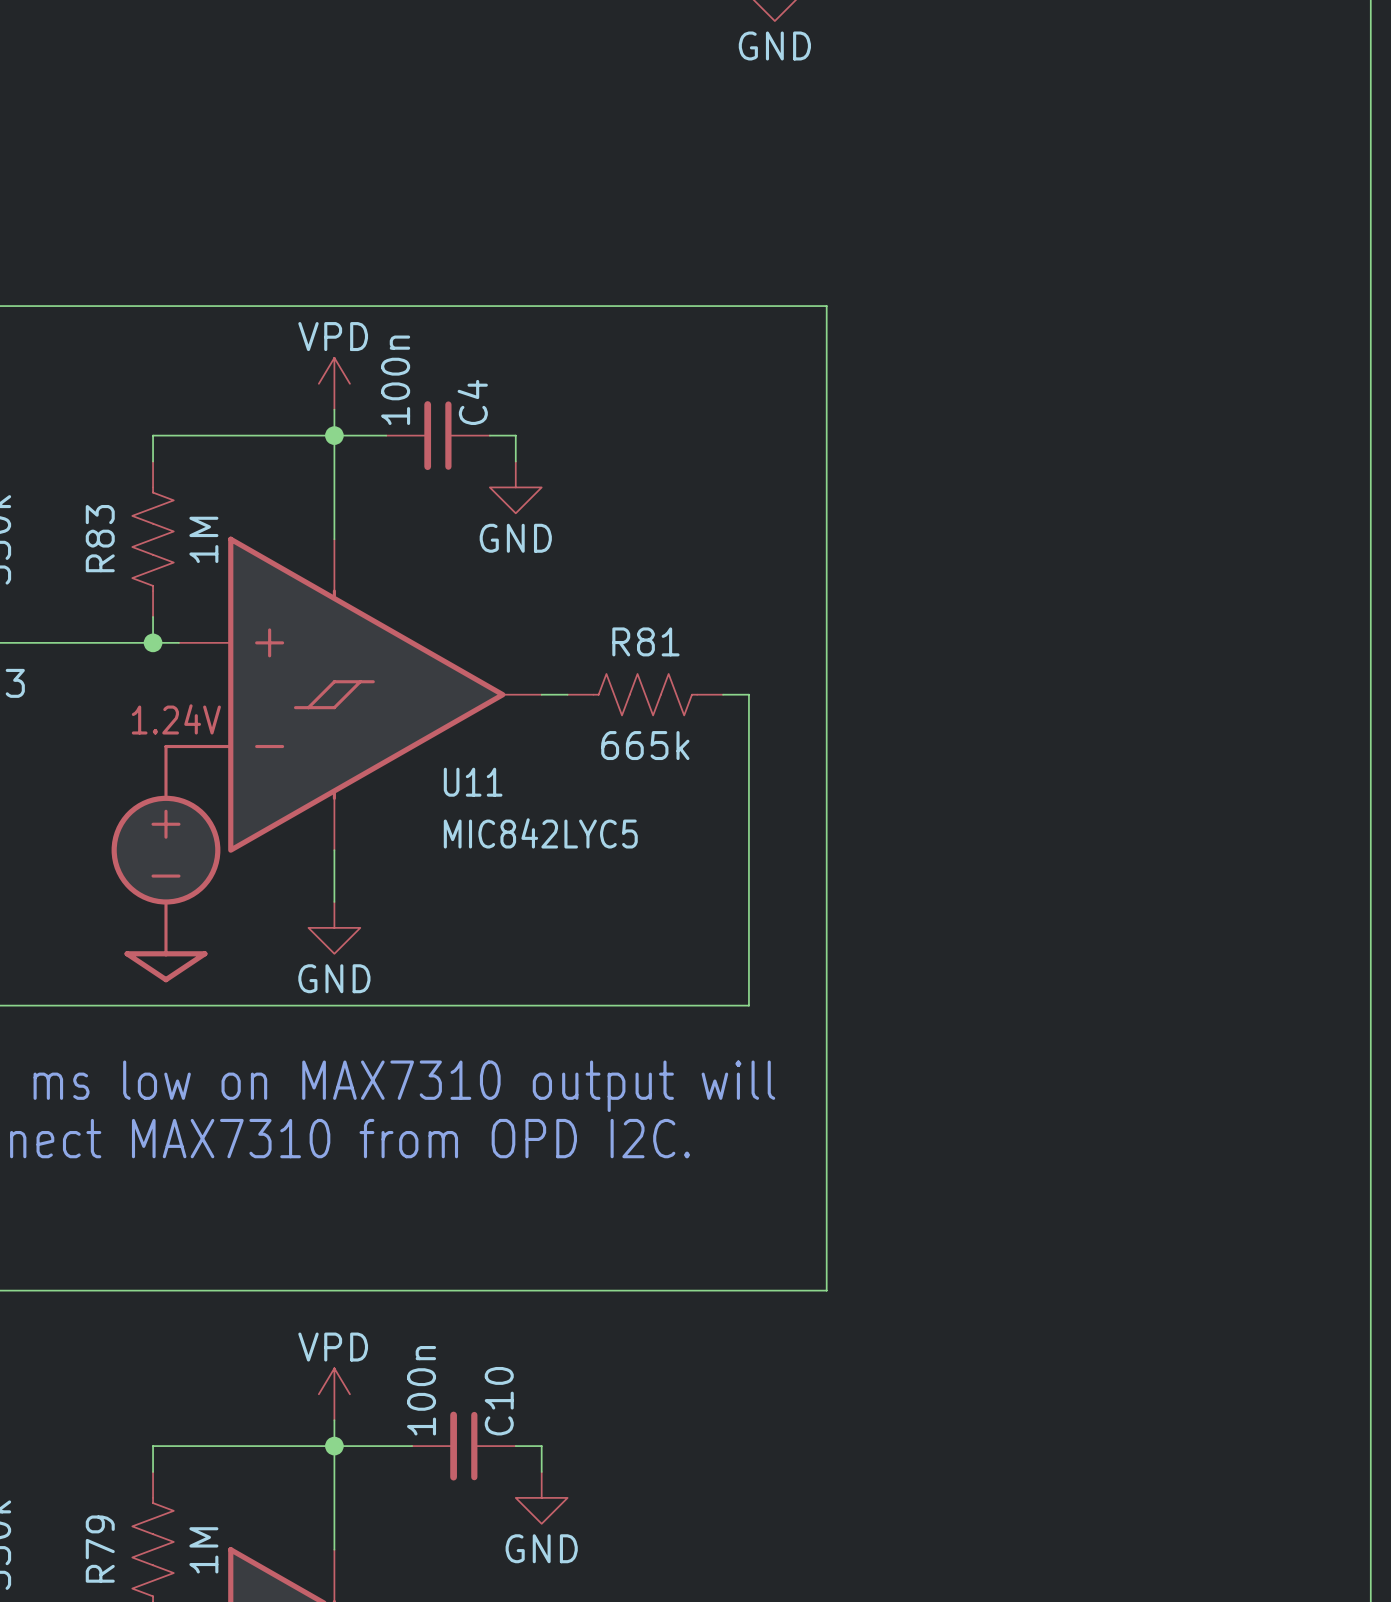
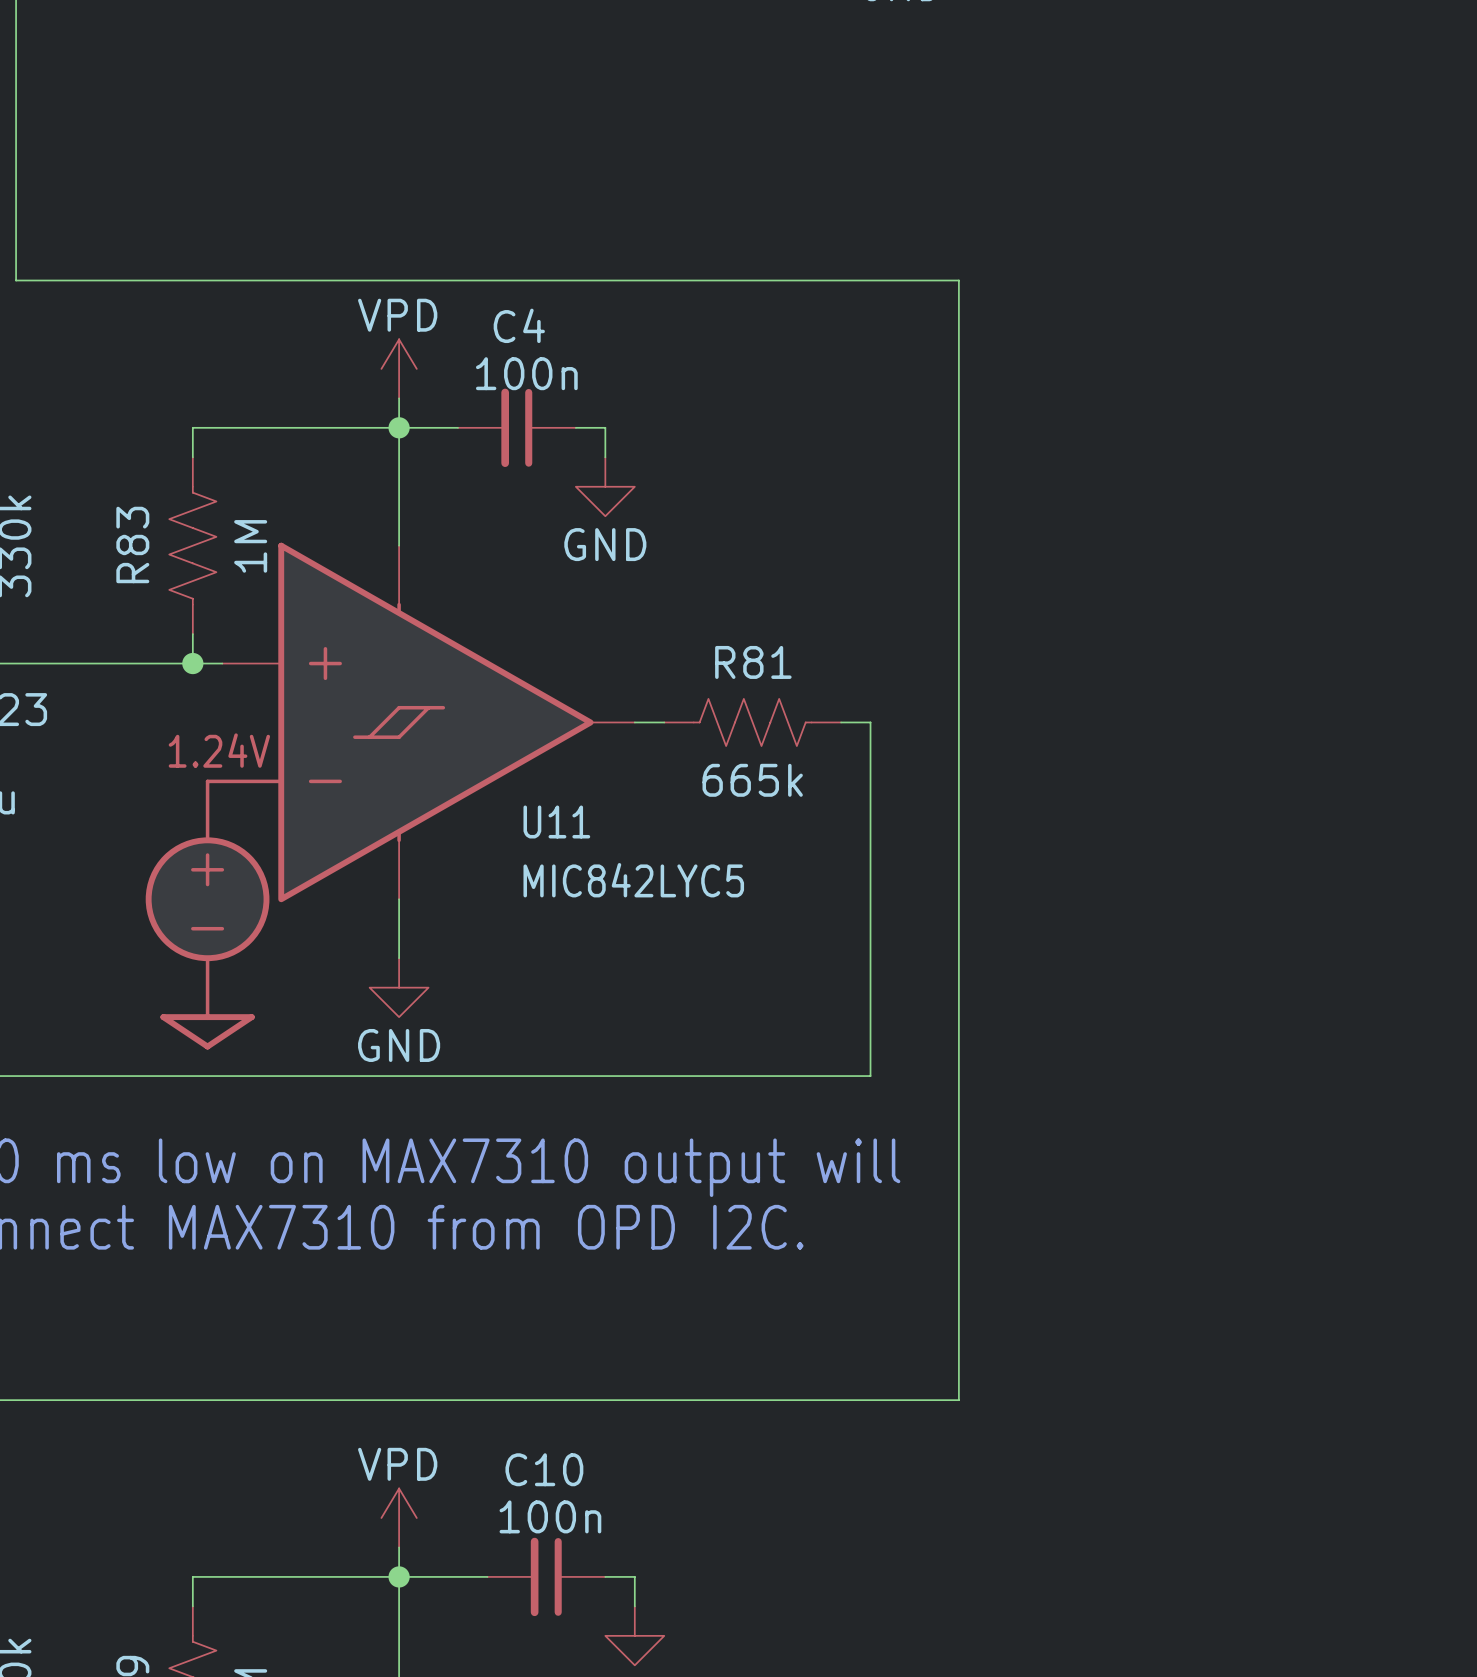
C4 value rotation: 0° (395, 380) -> 90° clockwise (526, 373)
C4 name rotation: 0° (472, 402) -> 90° clockwise (519, 325)
C10 value rotation: 0° (421, 1390) -> 90° clockwise (550, 1516)
C10 name rotation: 0° (499, 1401) -> 90° clockwise (544, 1469)

